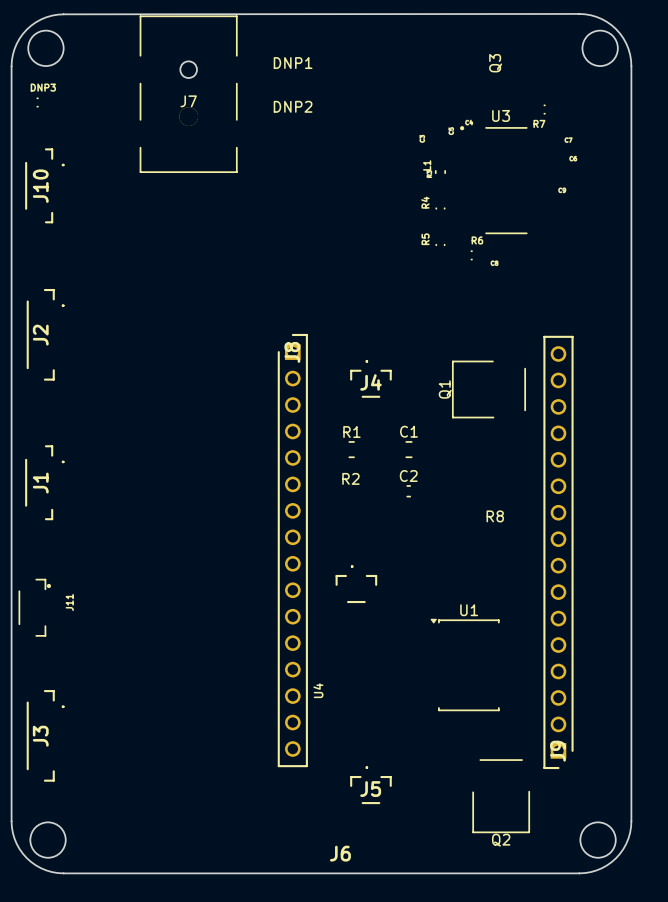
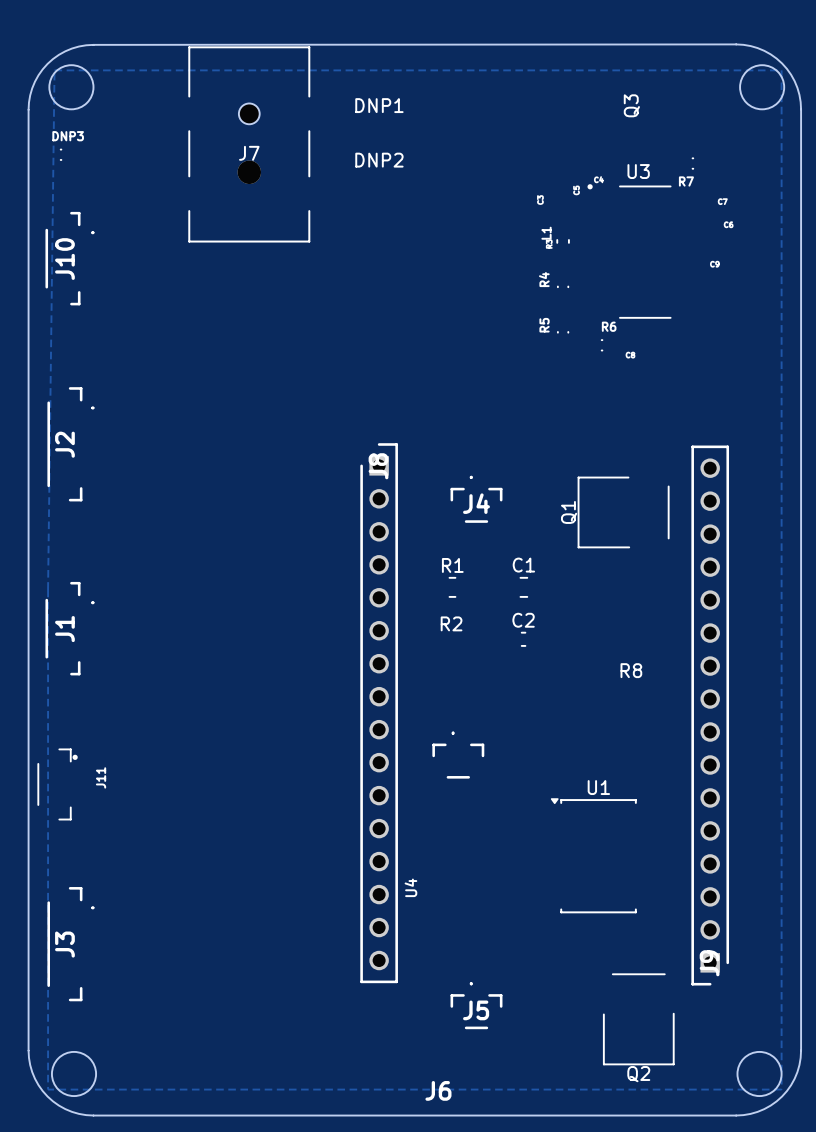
zone outline: none -> (54, 70) (781, 70) (781, 1089) (48, 1089) (48, 589) (54, 70)

